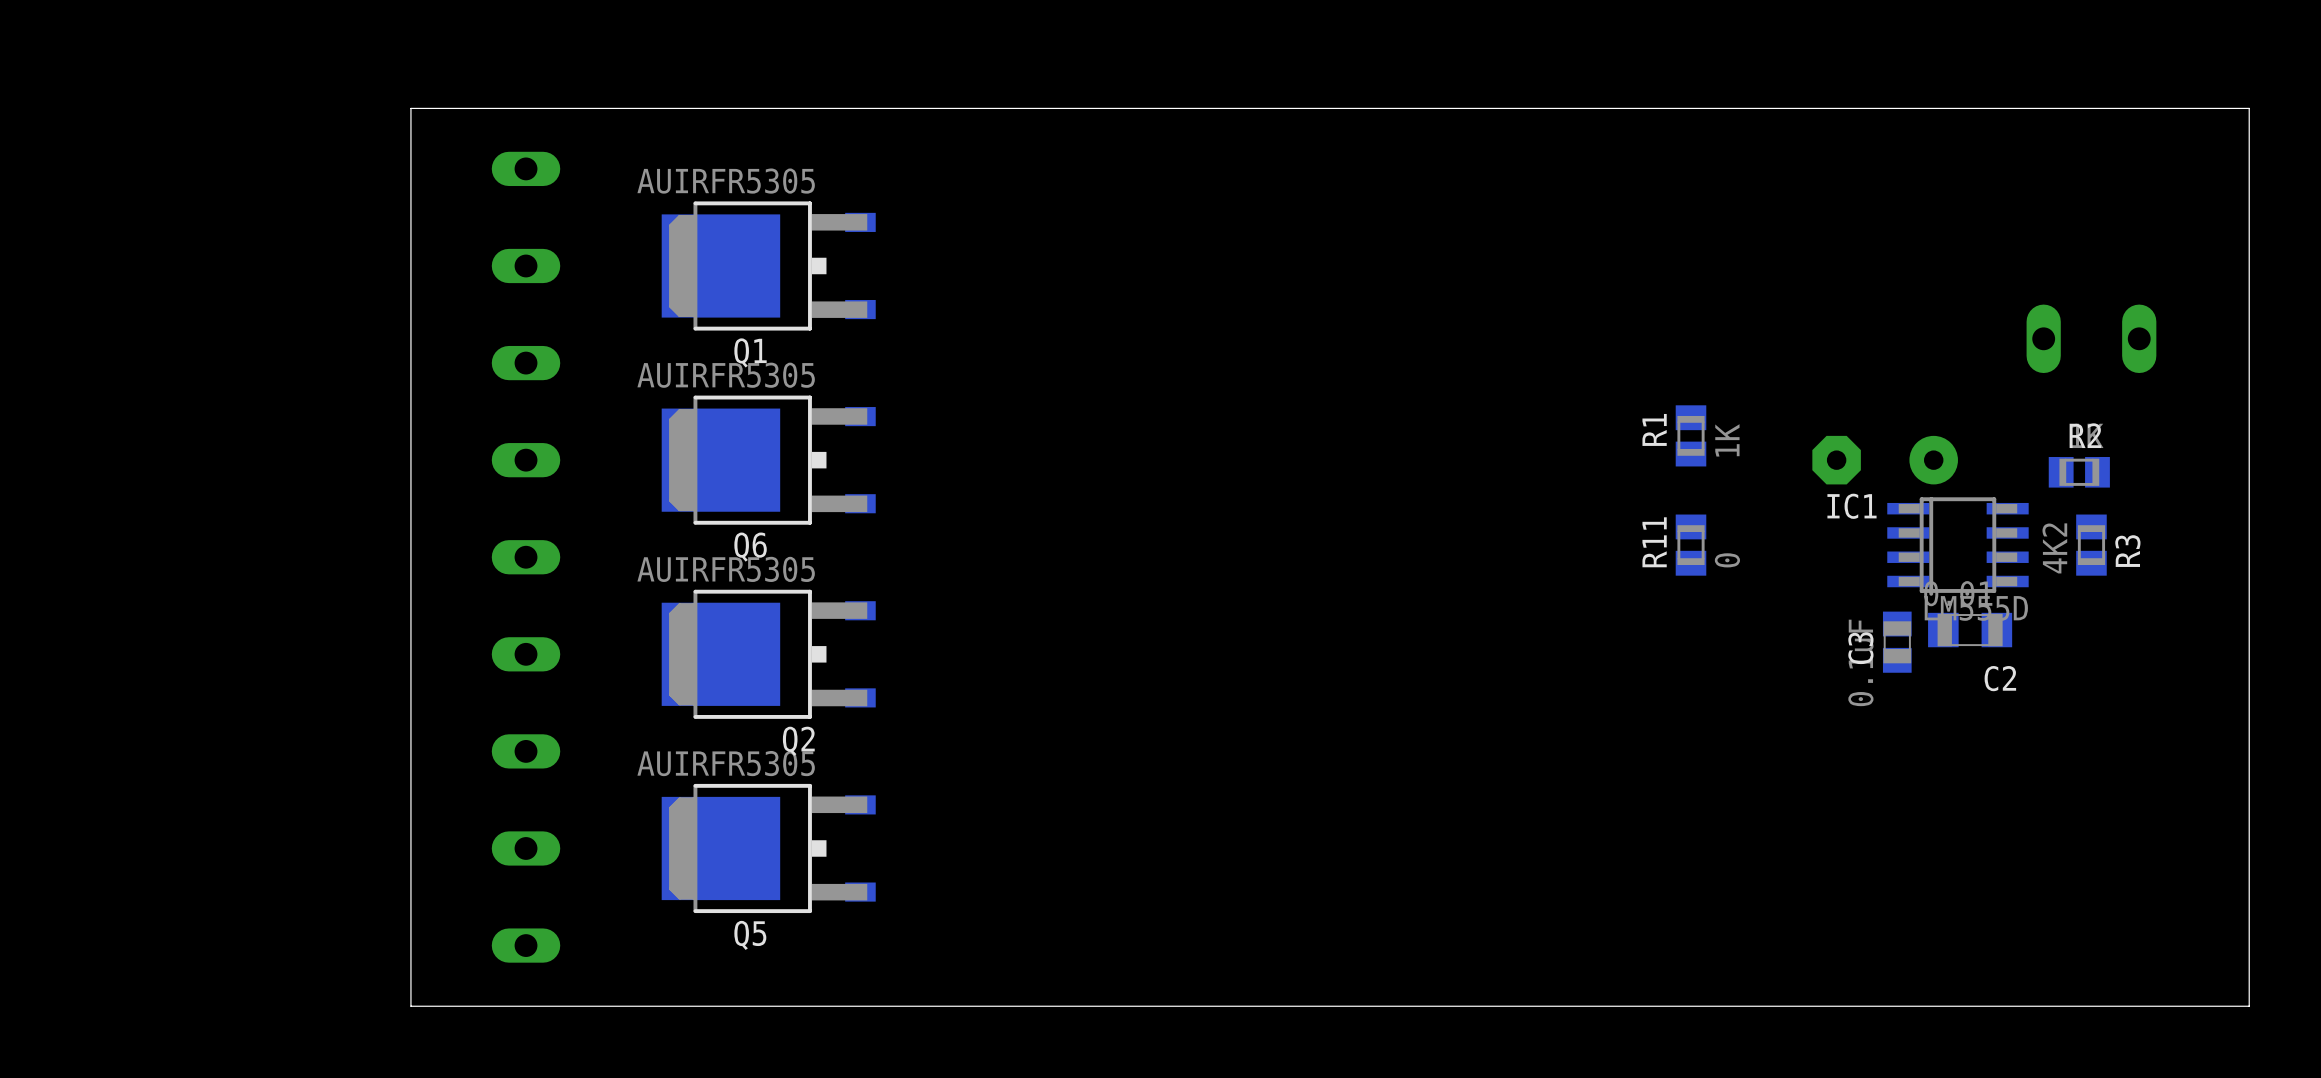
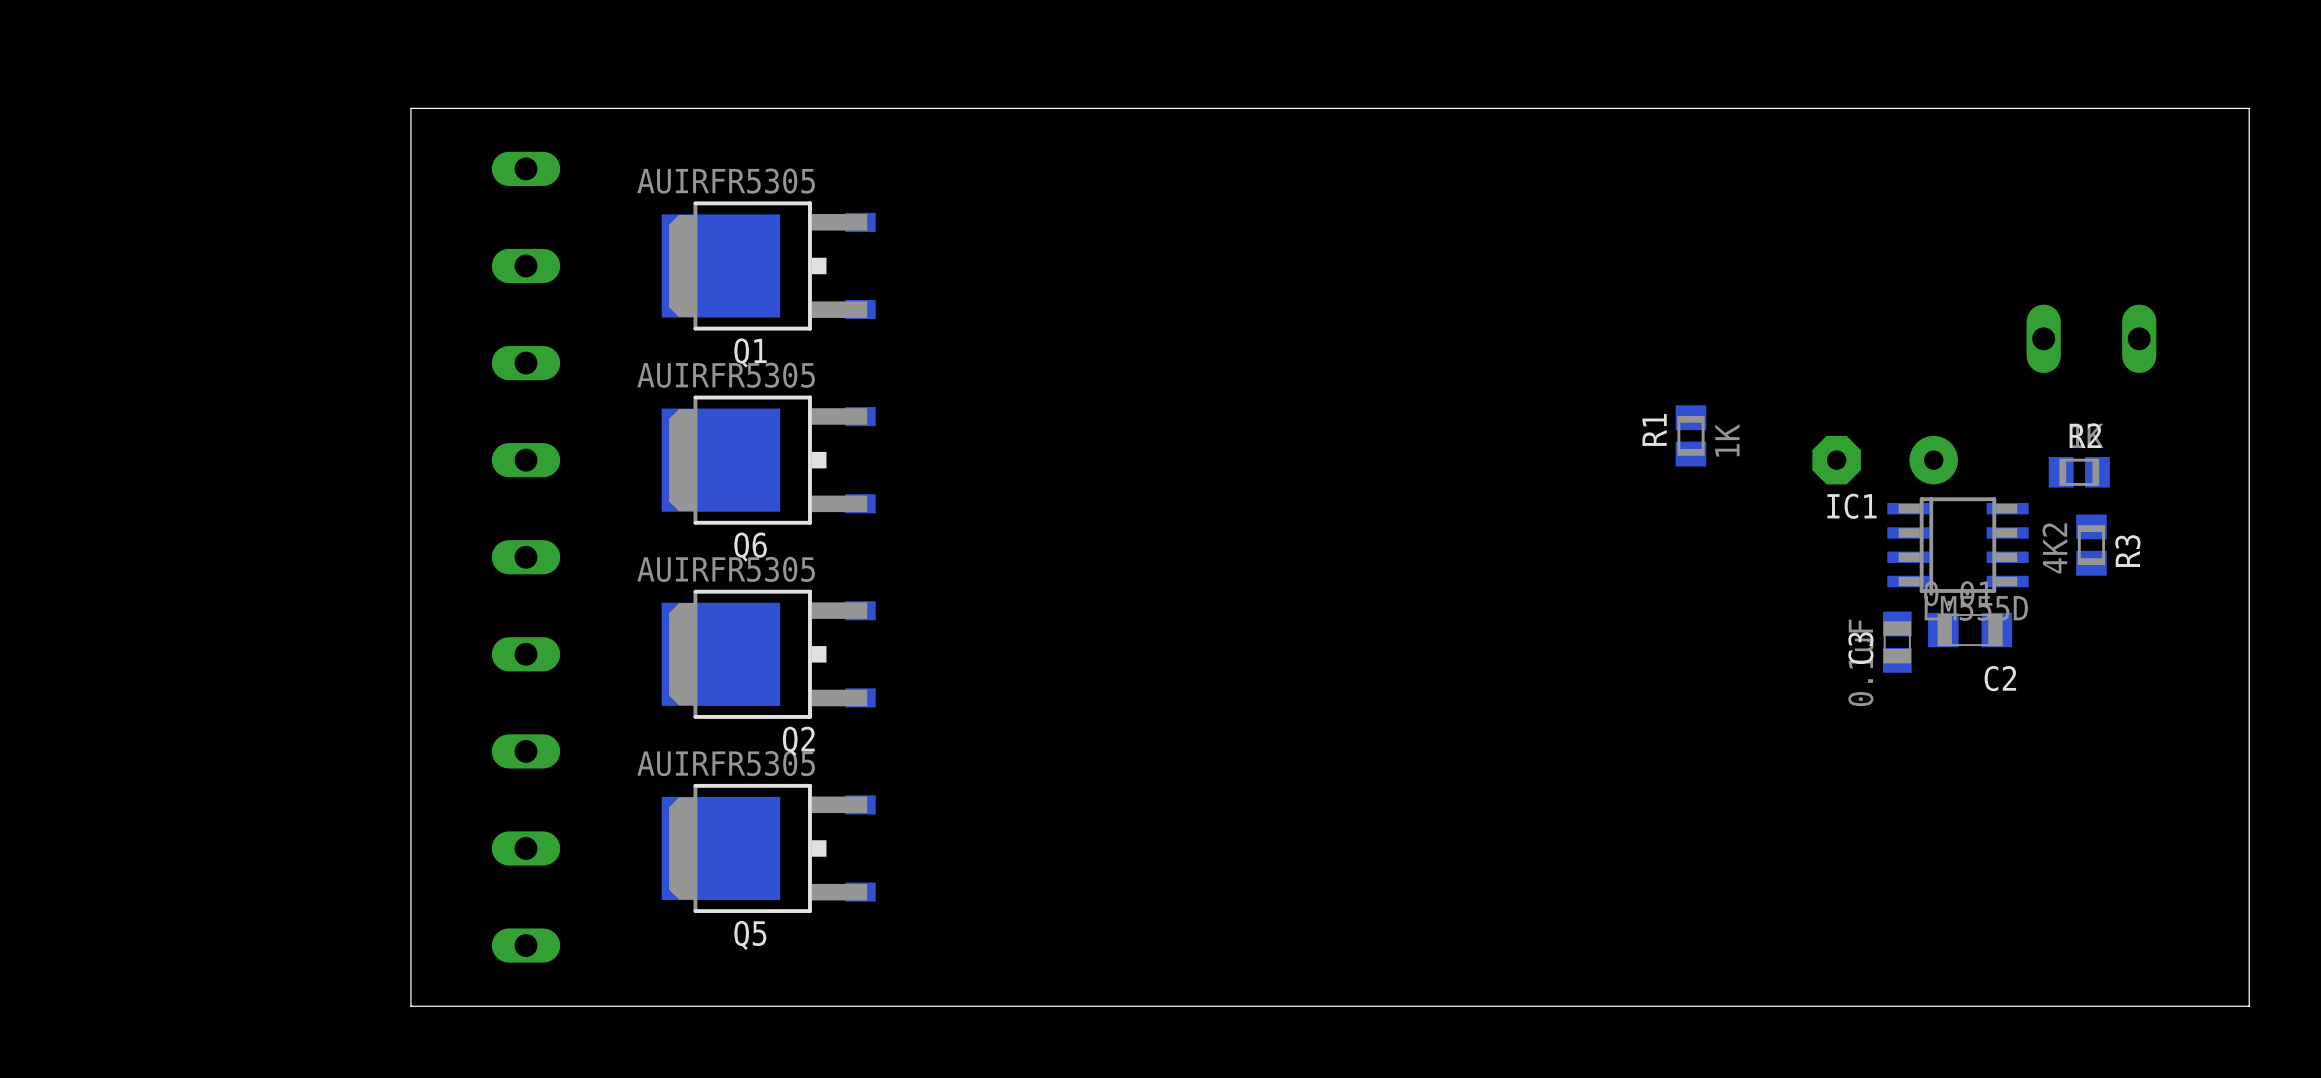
R11: 0 (1691, 545) -> none

